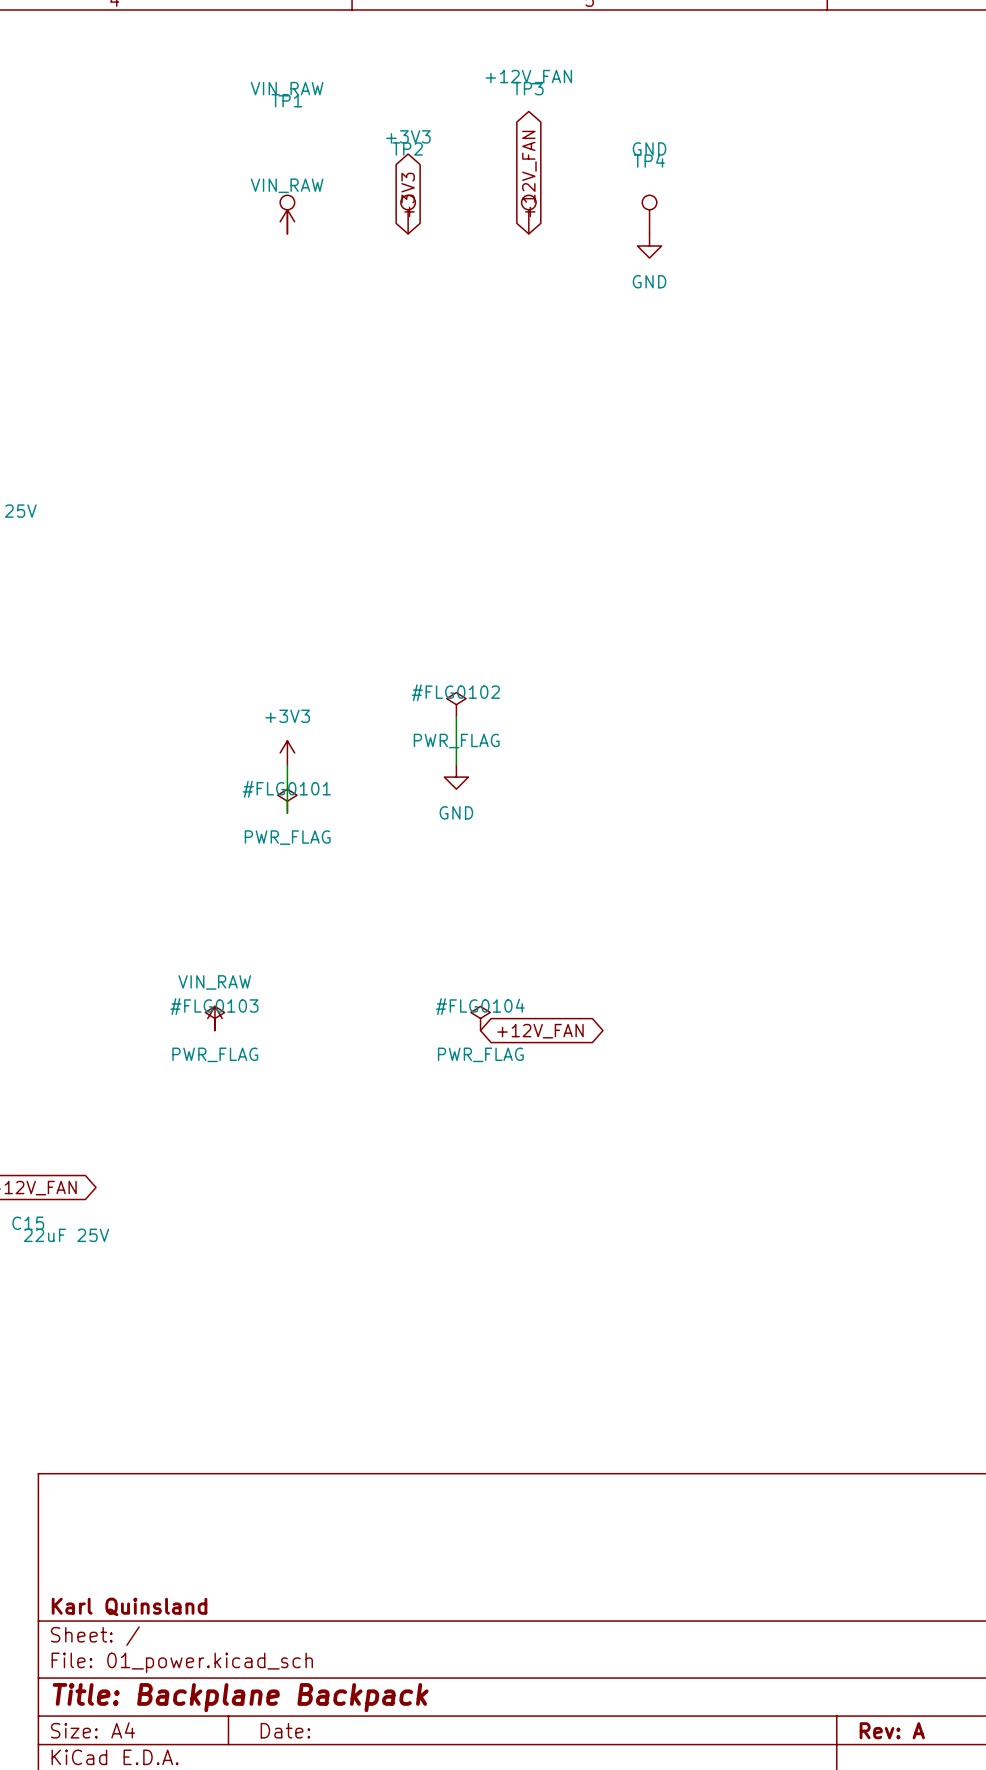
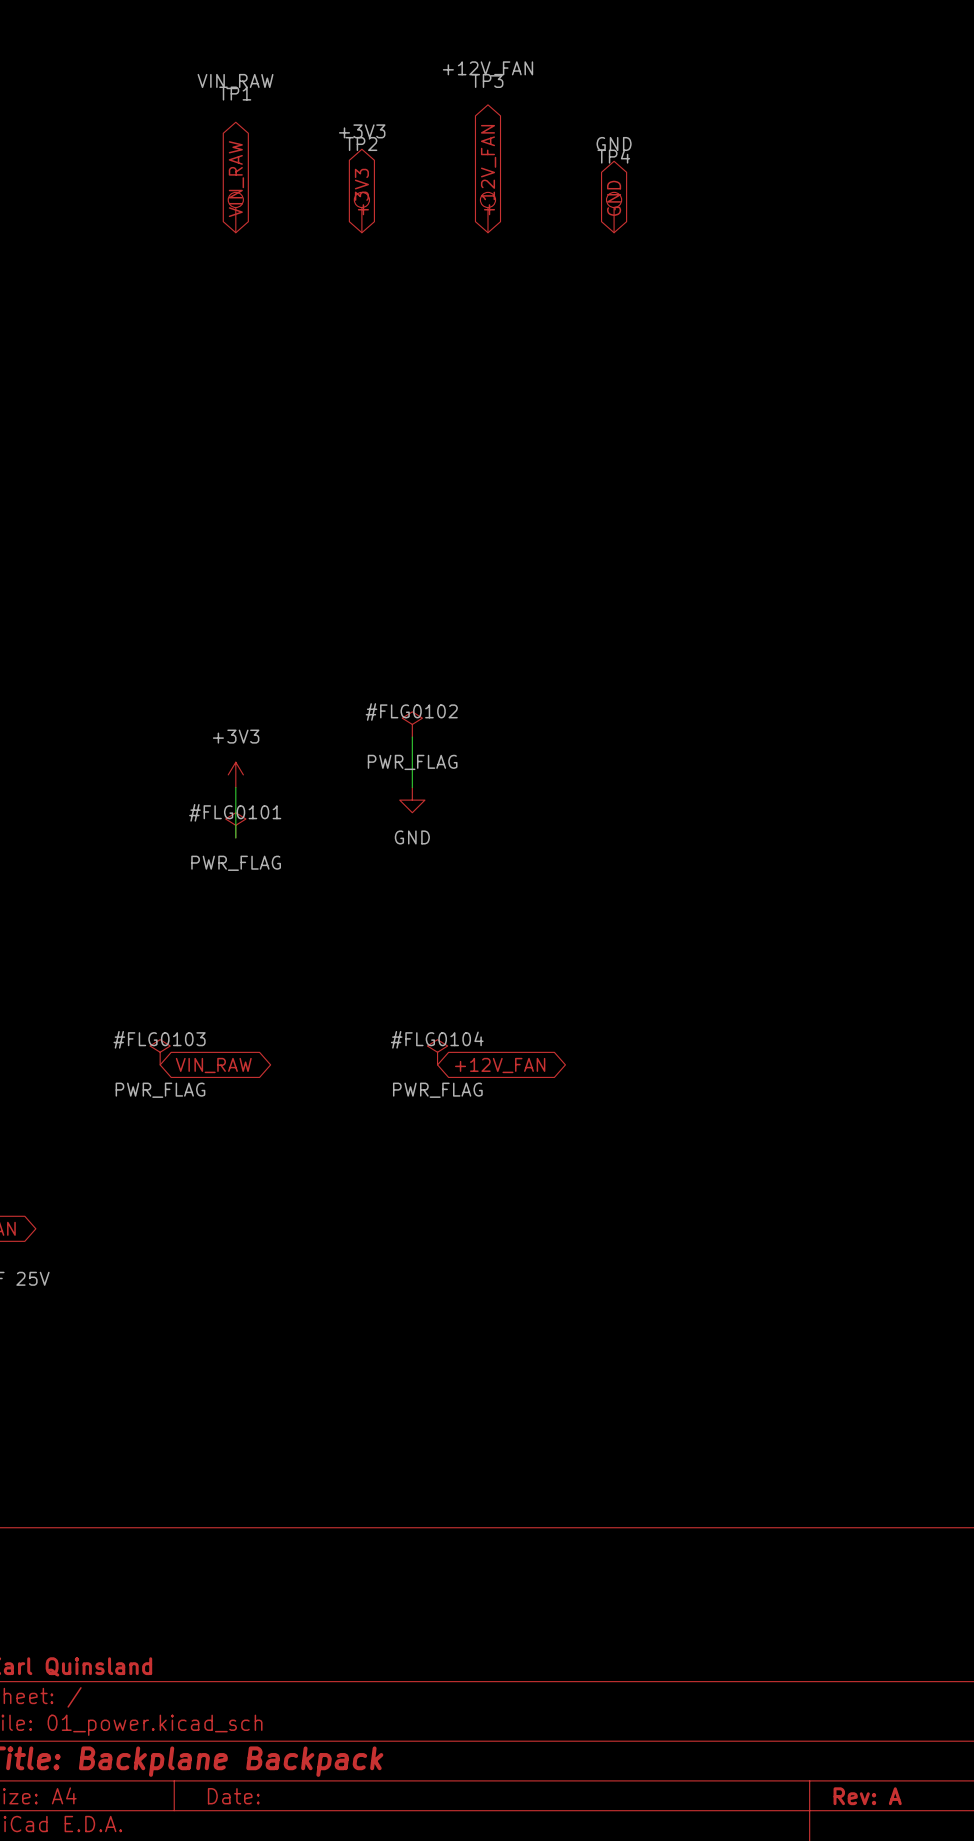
global label: none -> VIN_RAW (236, 179)
global label: none -> GND (614, 198)
power symbol: VIN_RAW (287, 221) -> none
power symbol: GND (649, 245) -> none
power symbol: VIN_RAW (214, 1018) -> none
global label: none -> VIN_RAW (213, 1065)

